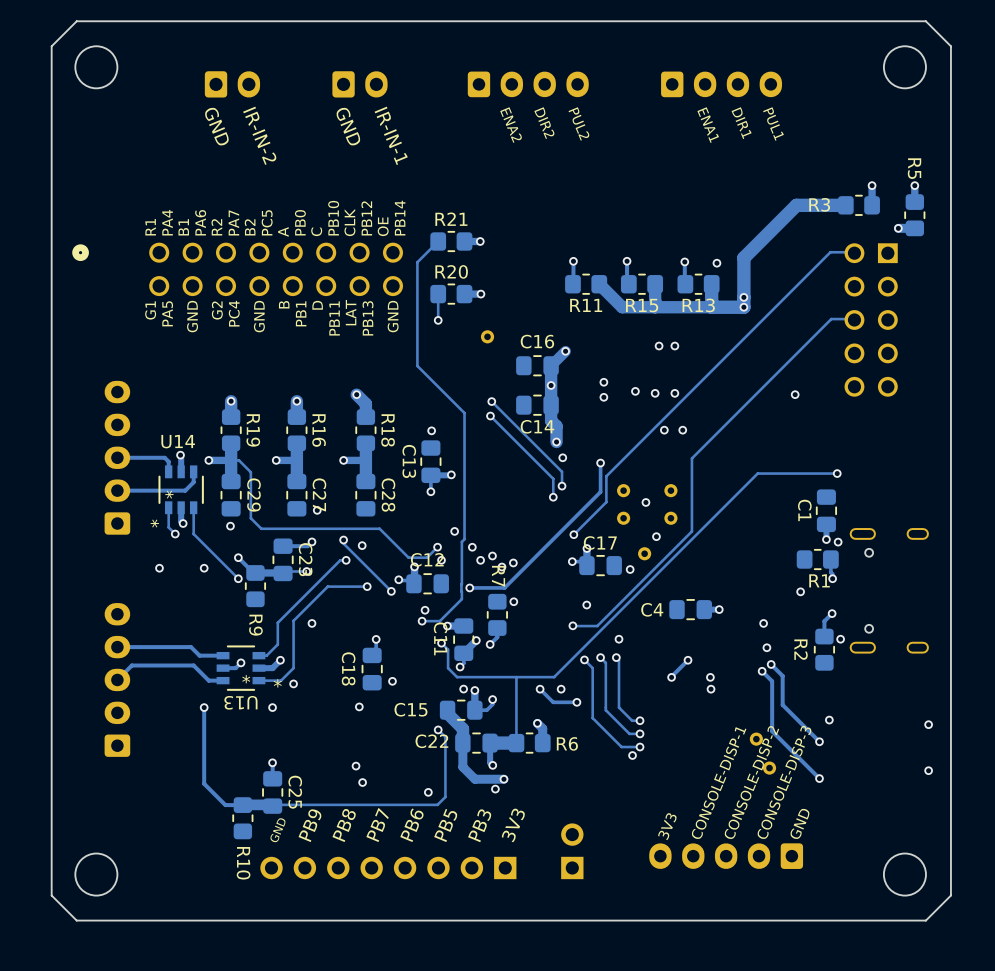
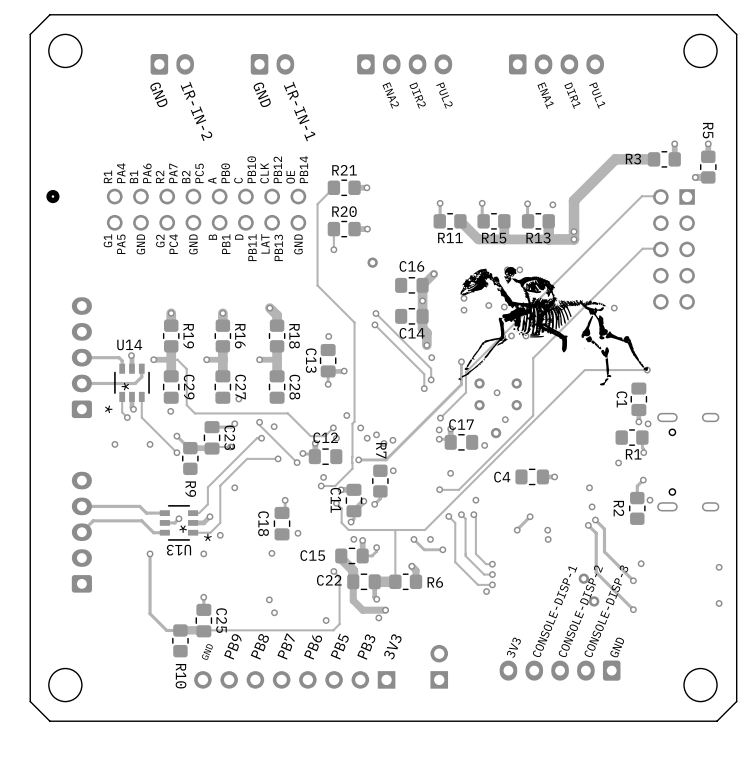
drawing: none -> [458, 266, 648, 386]
via: none -> (439, 429)

